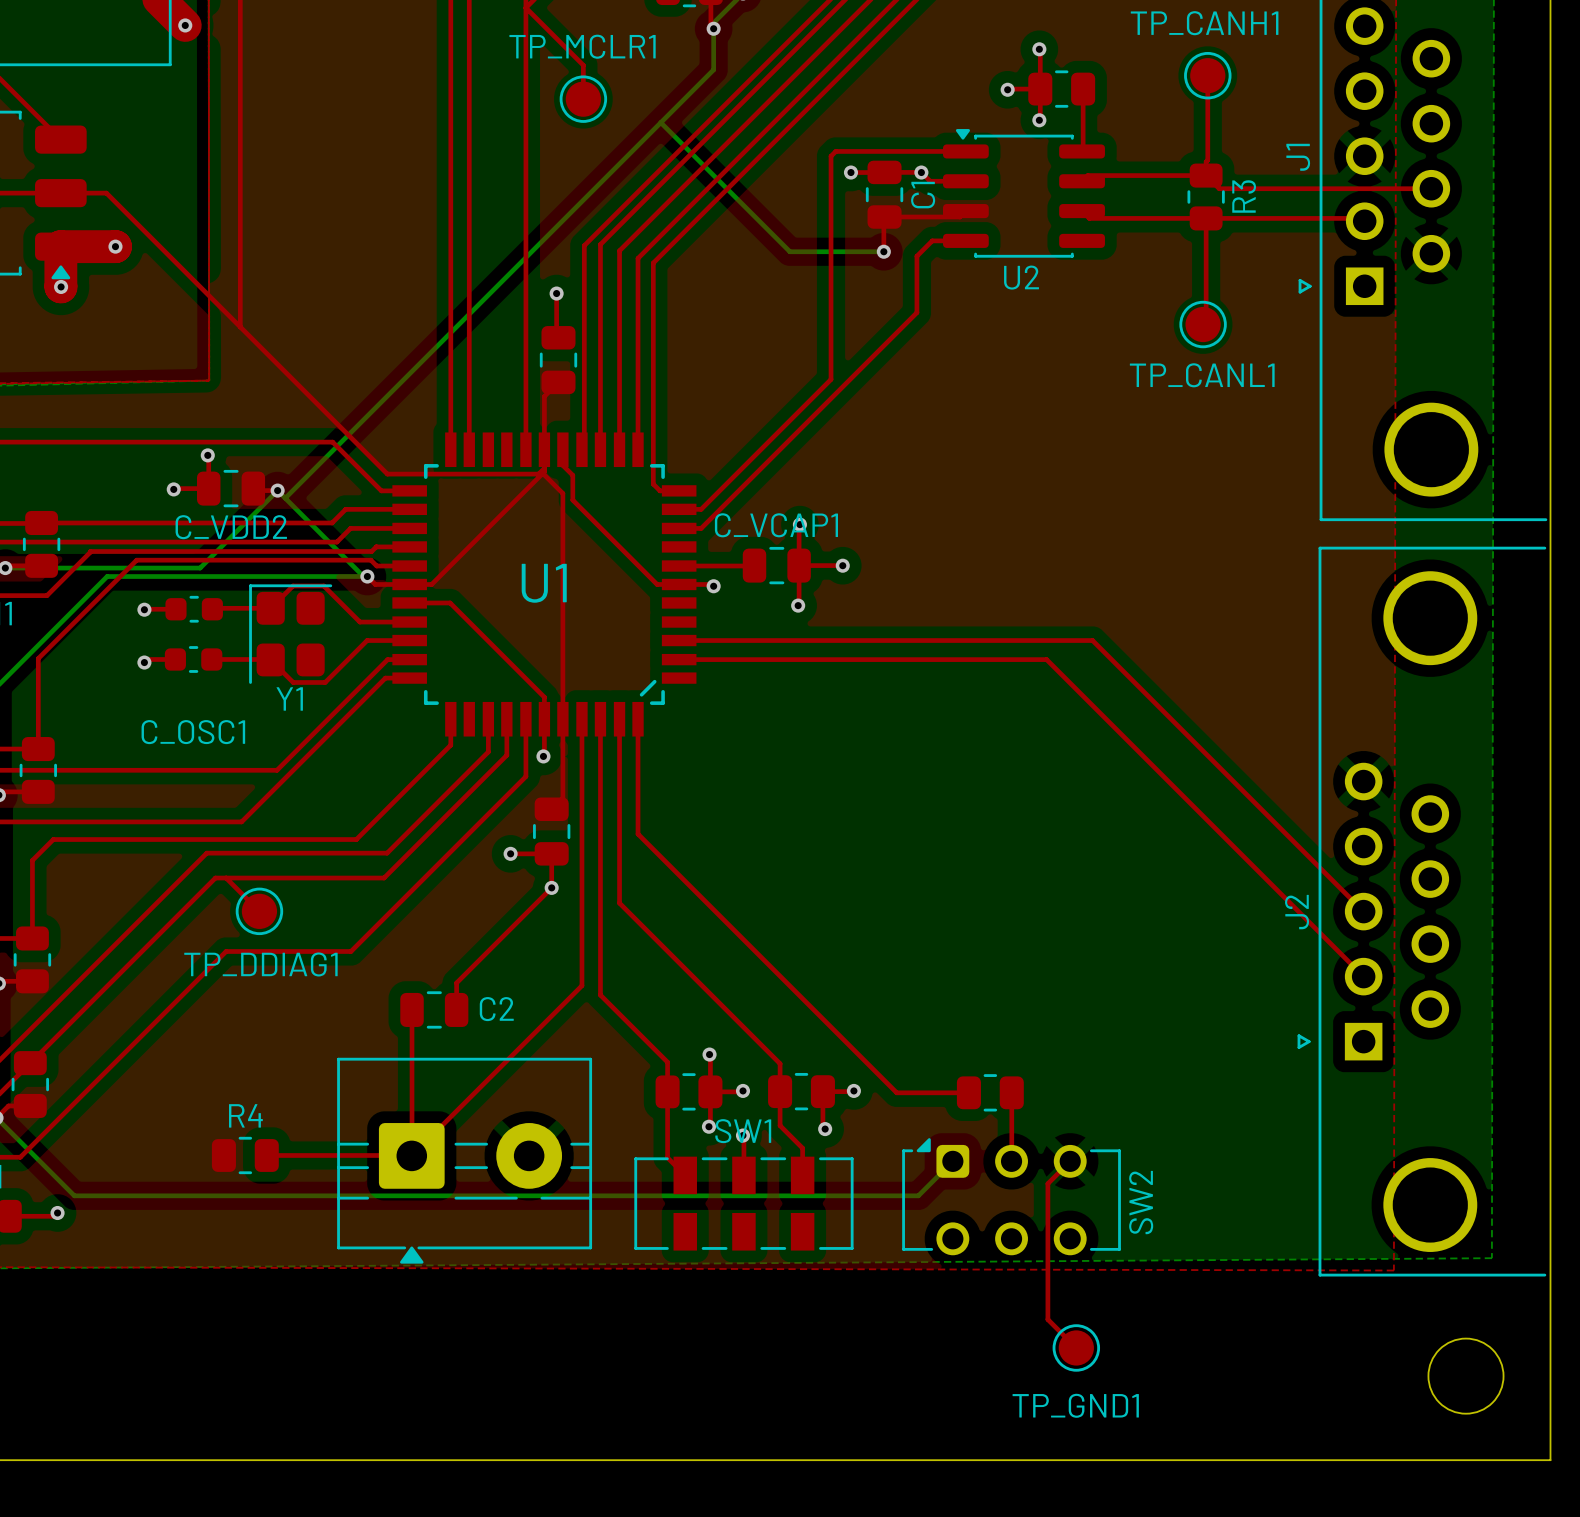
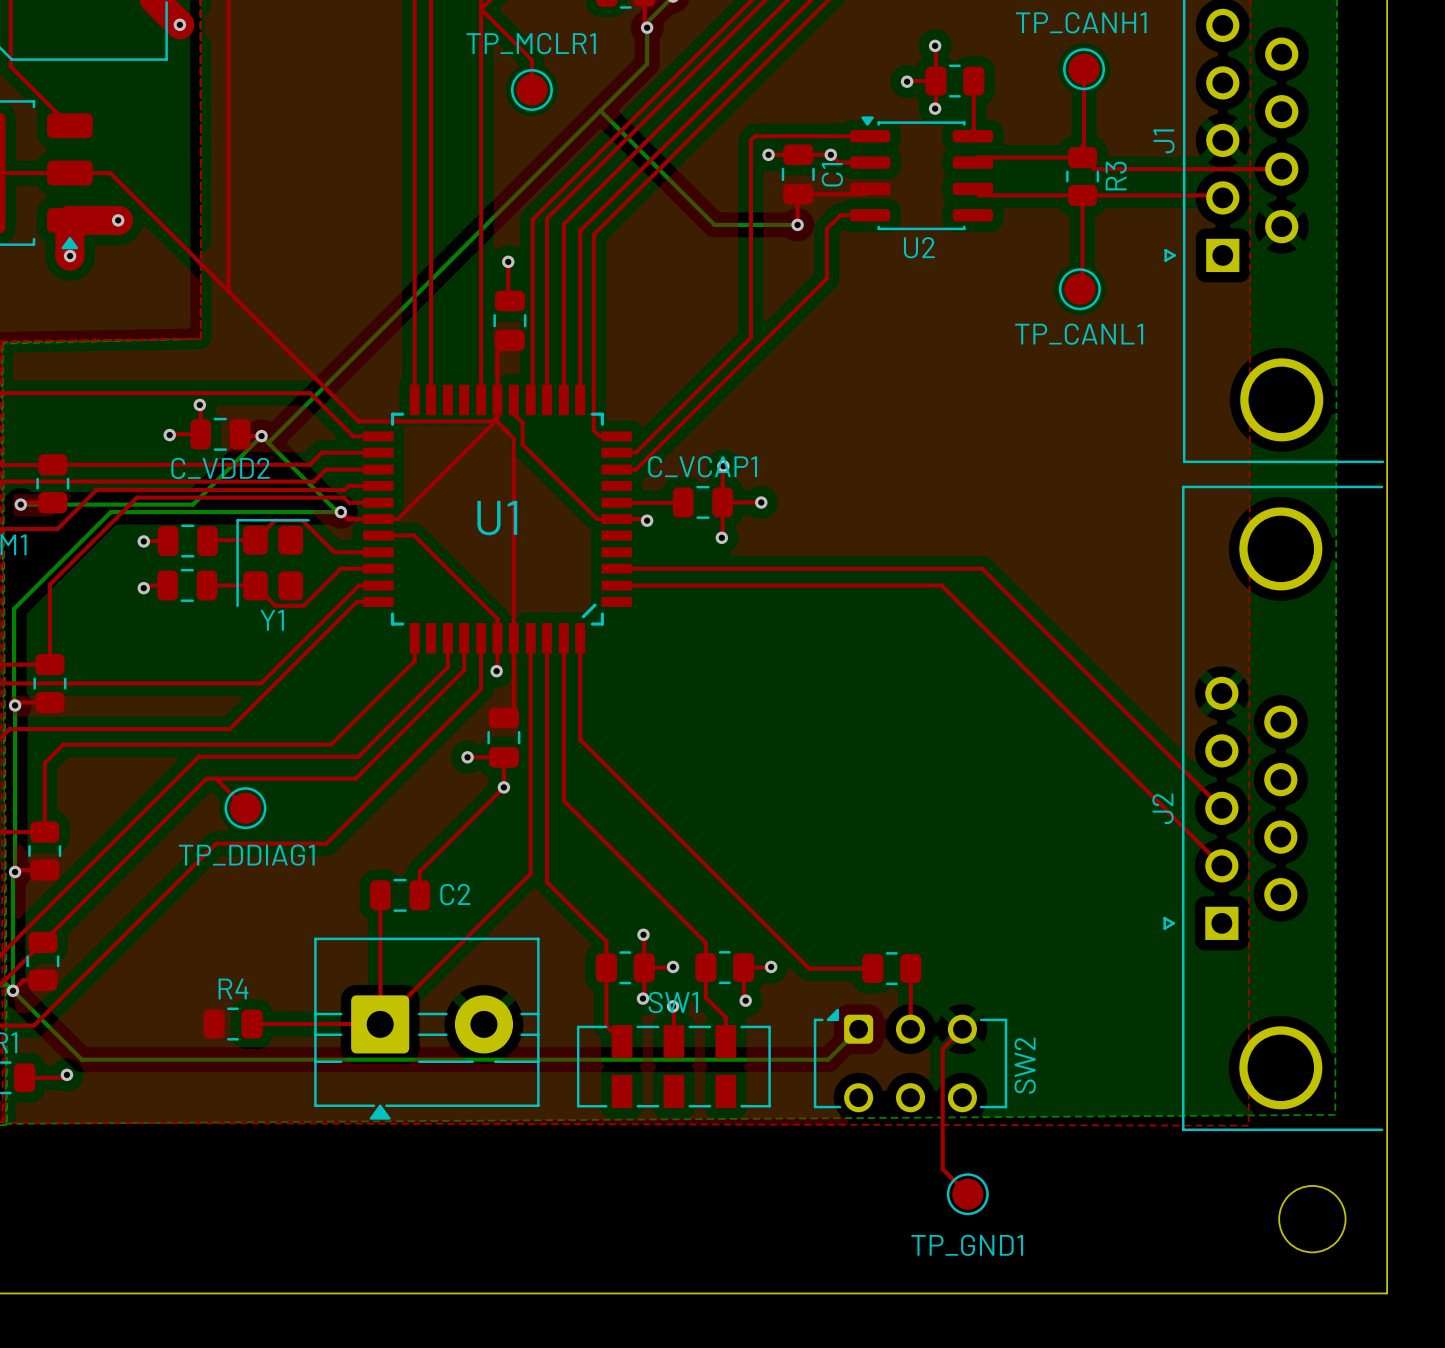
C_OSC1: (194, 609) -> none
part: none -> (187, 541)
part footprint: [164, 646, 223, 673] -> [157, 568, 218, 602]

